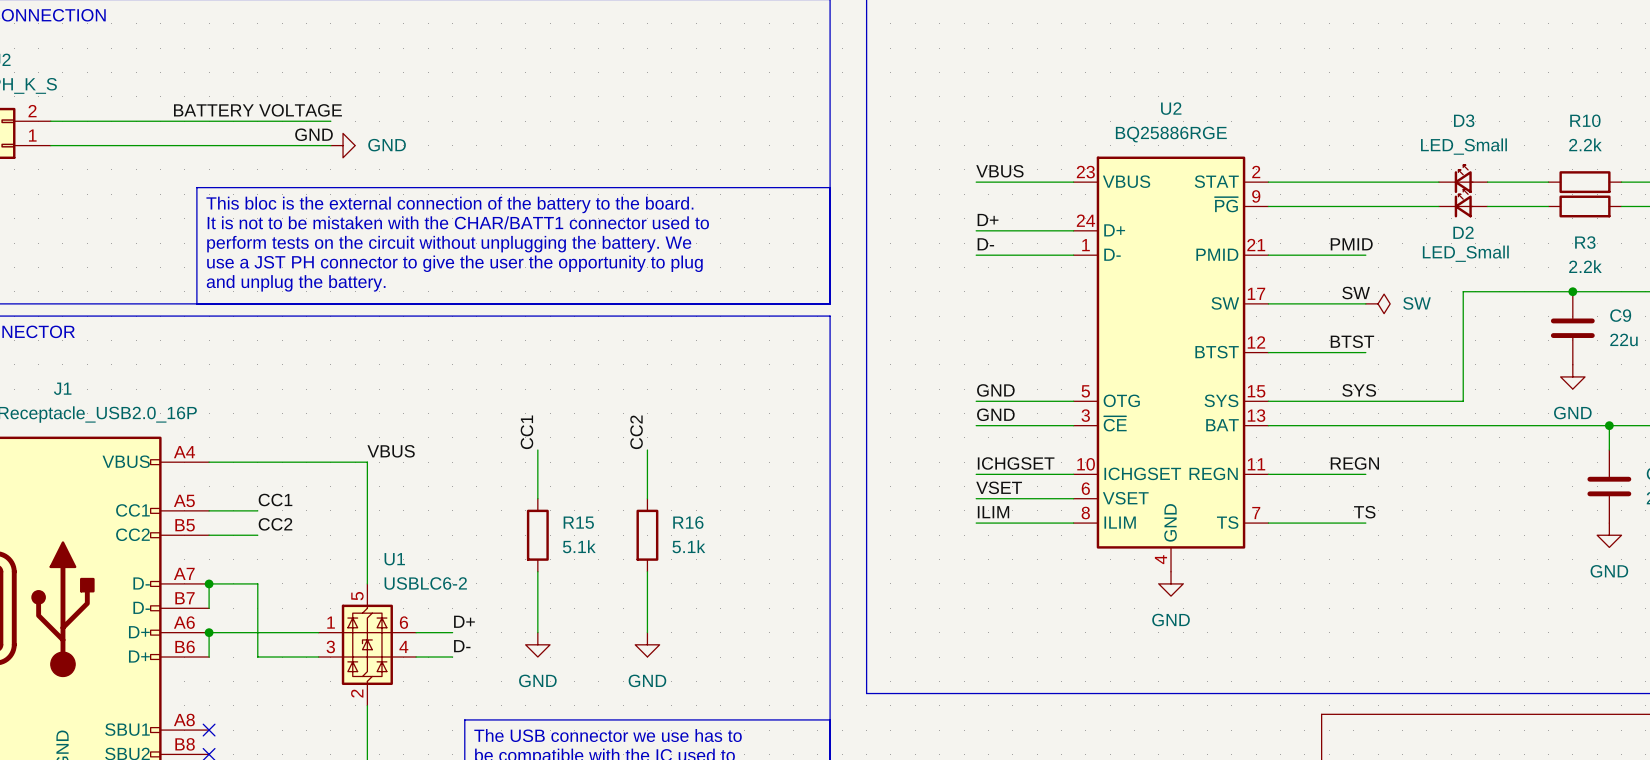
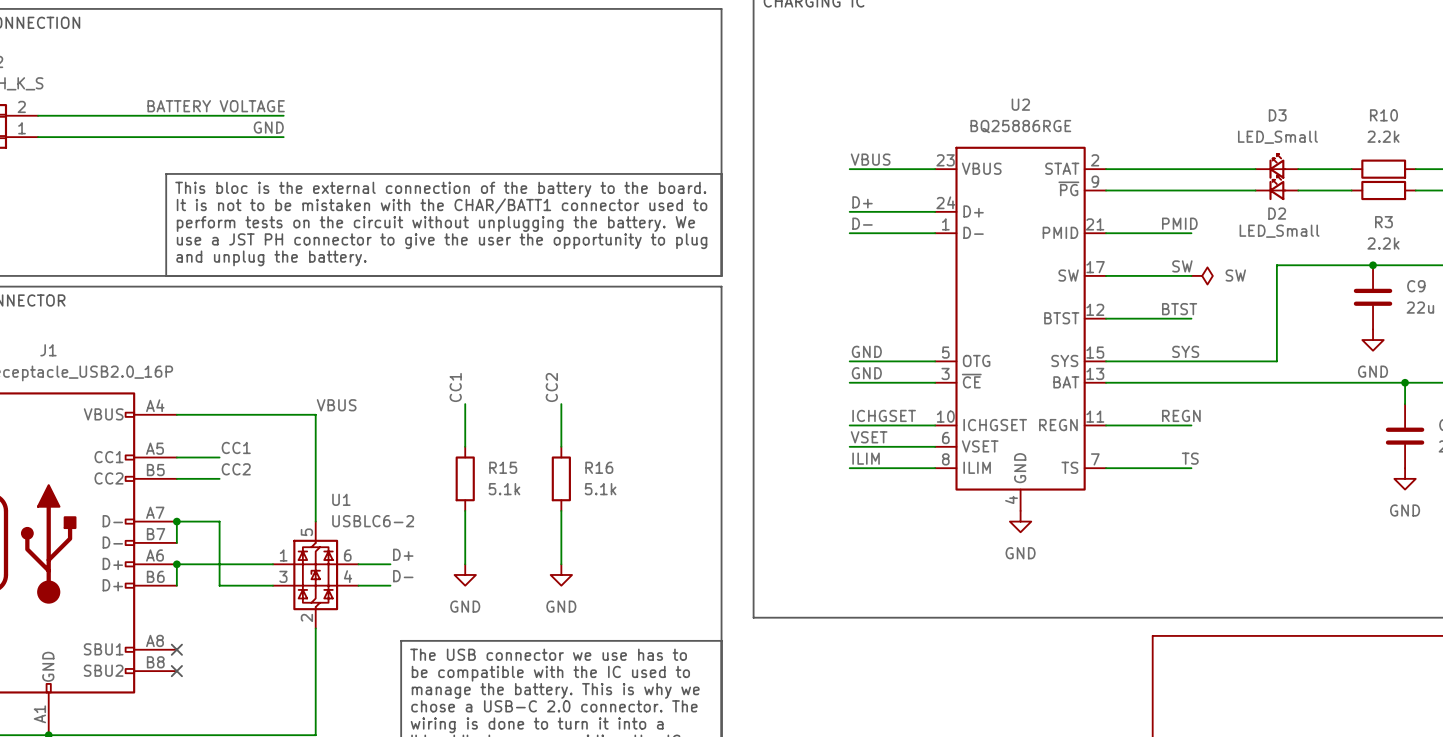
power symbol: GND (343, 145) -> none

